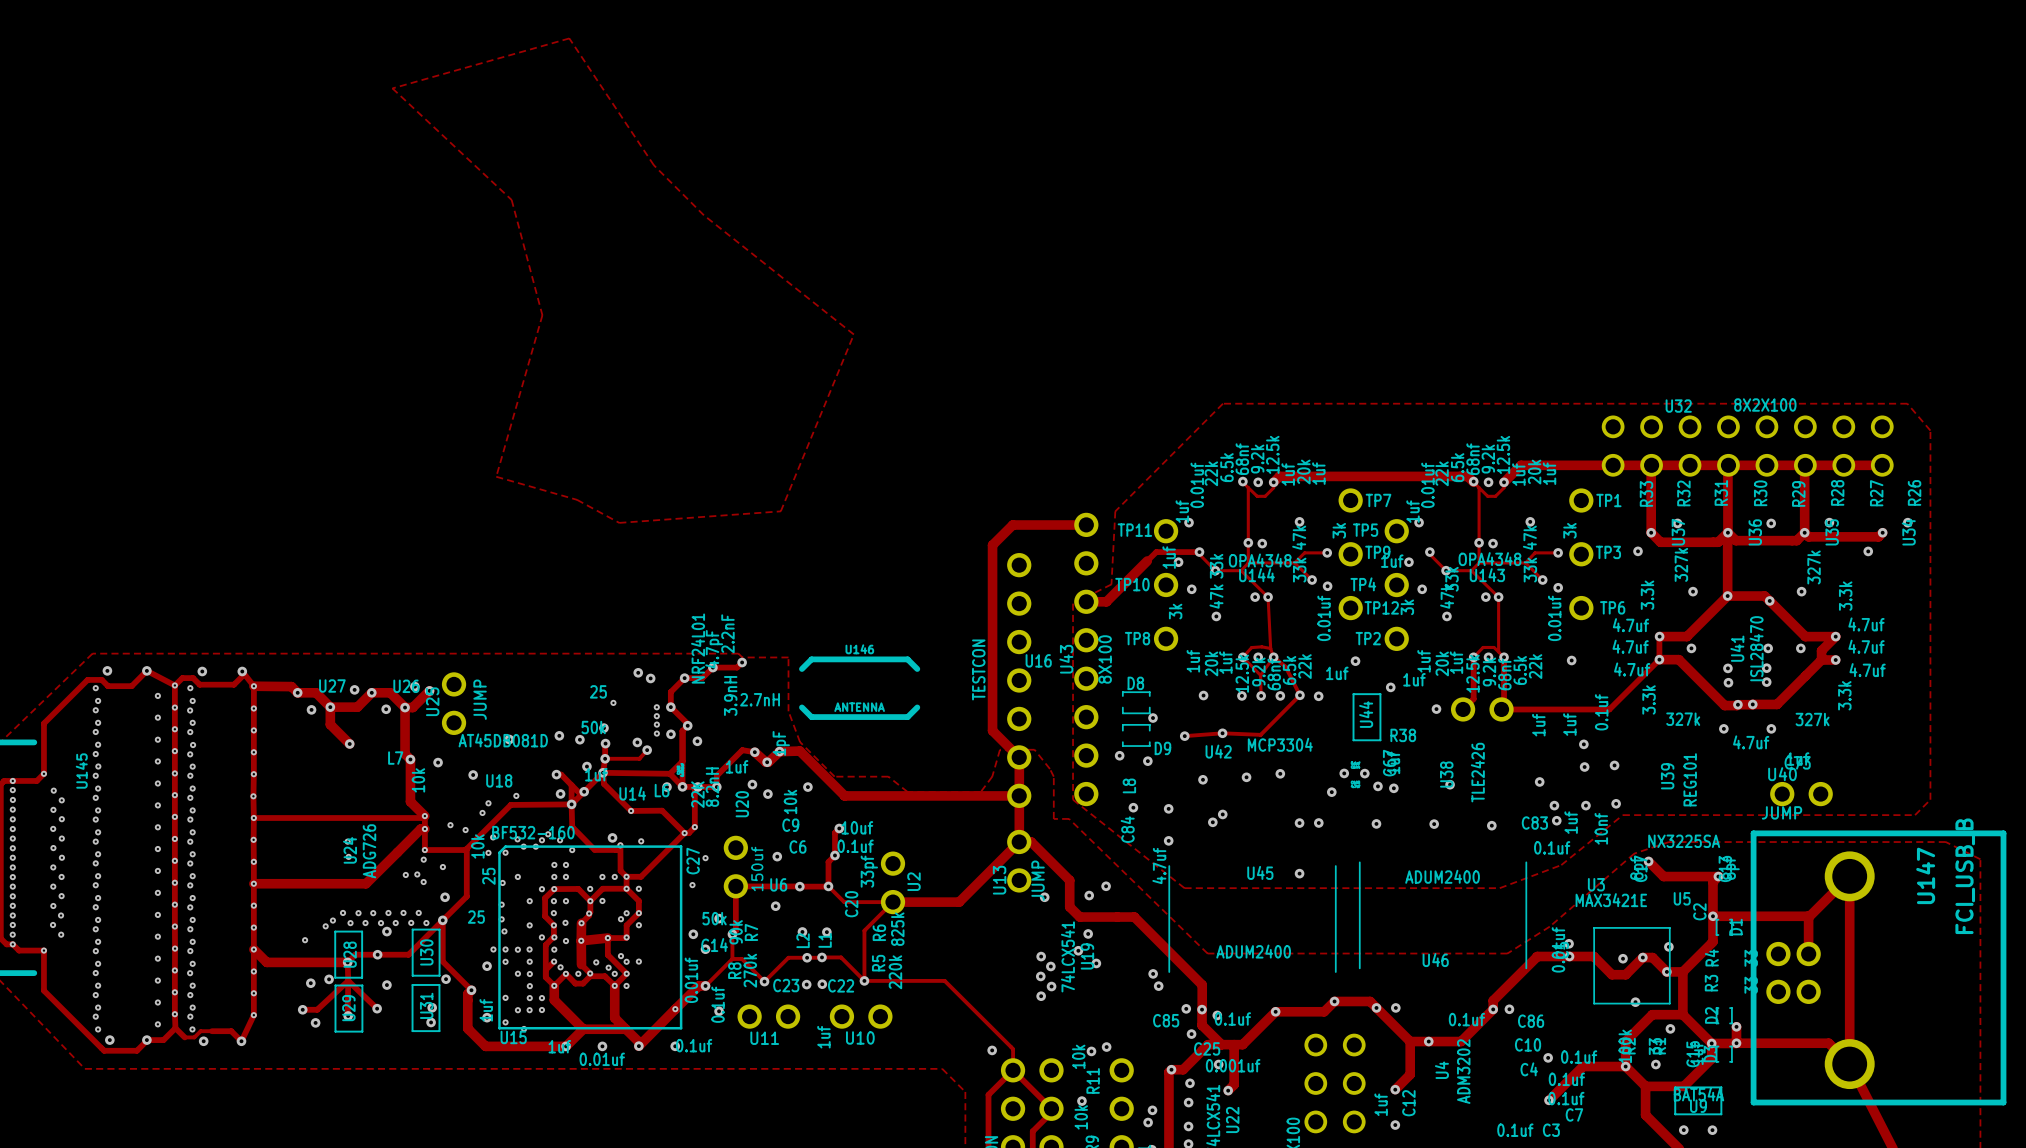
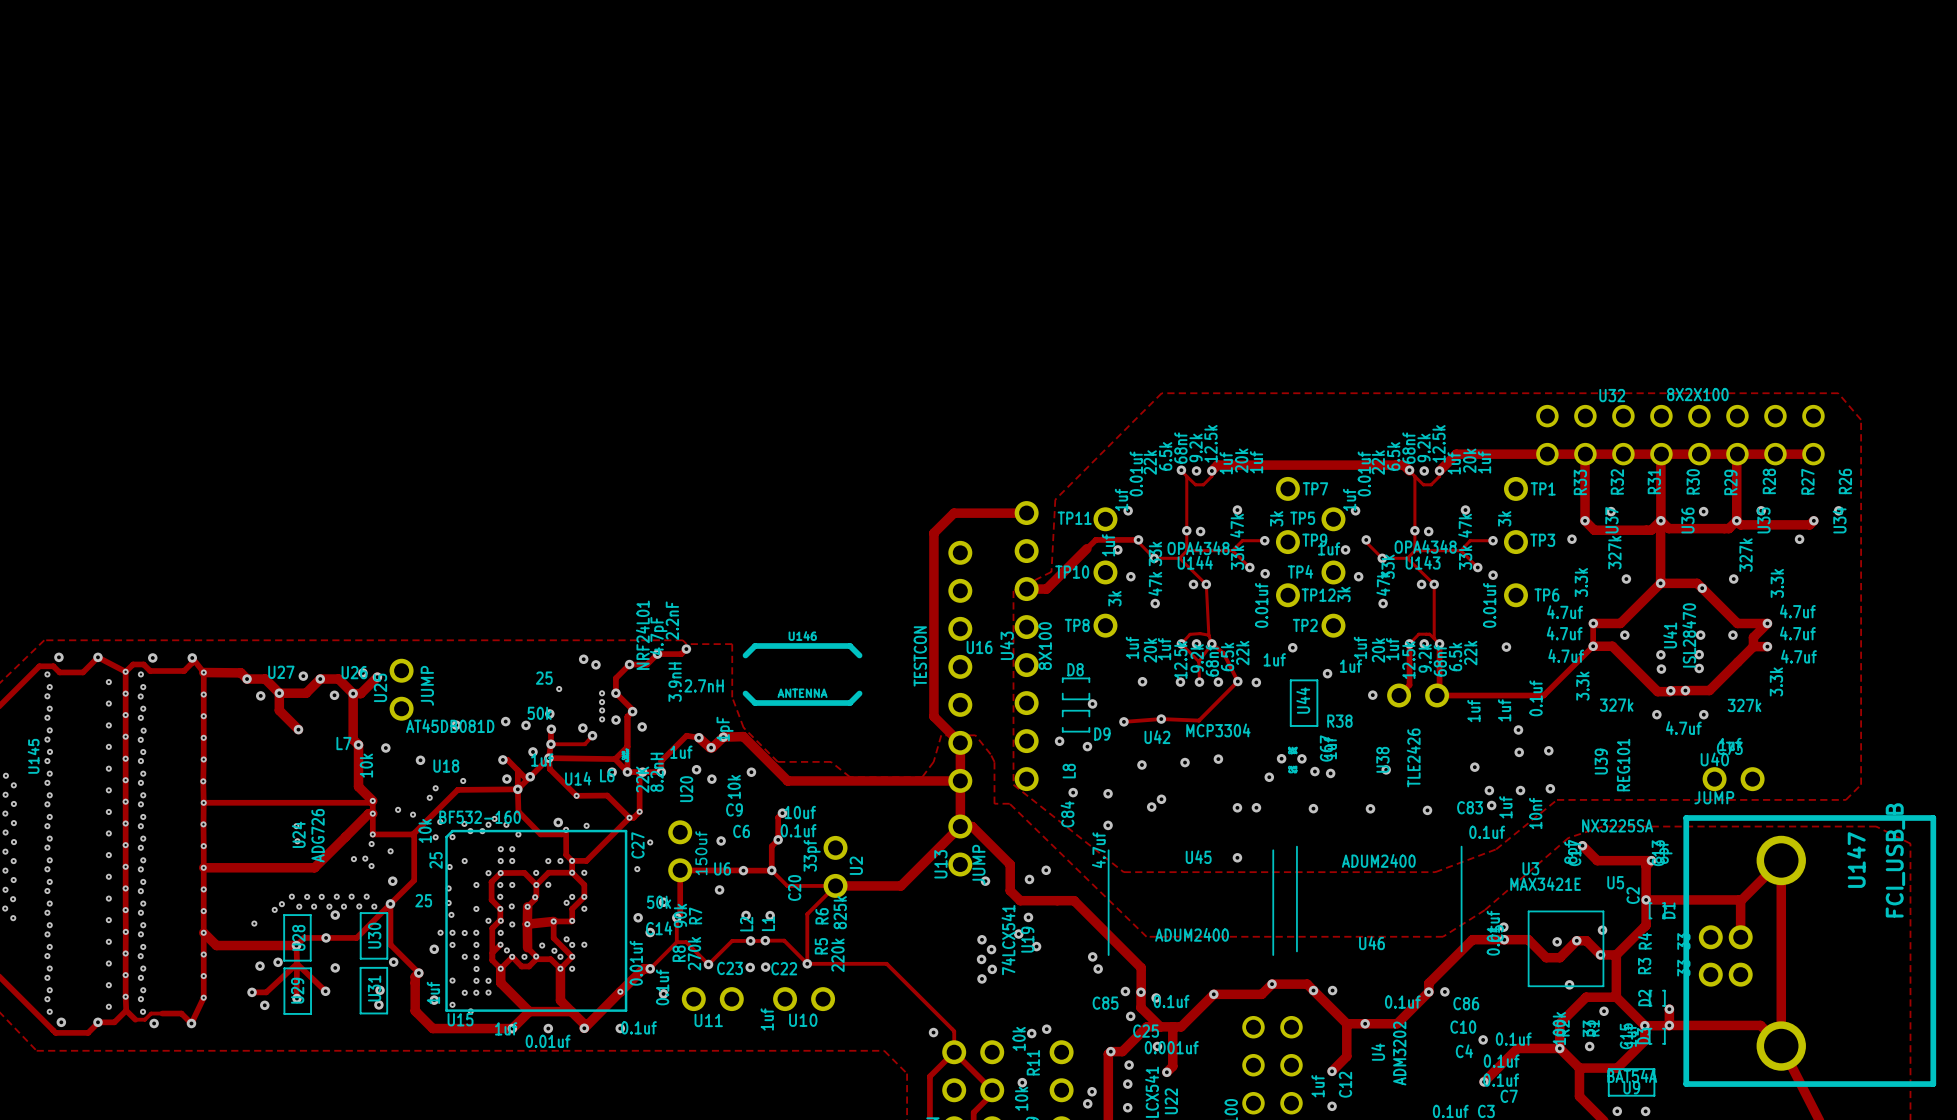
zone outline: (569, 38) (653, 165) (703, 215) (853, 334) (780, 511) (619, 522) (577, 499) (496, 476) (542, 315) (511, 199) (392, 88) (569, 38) -> none

